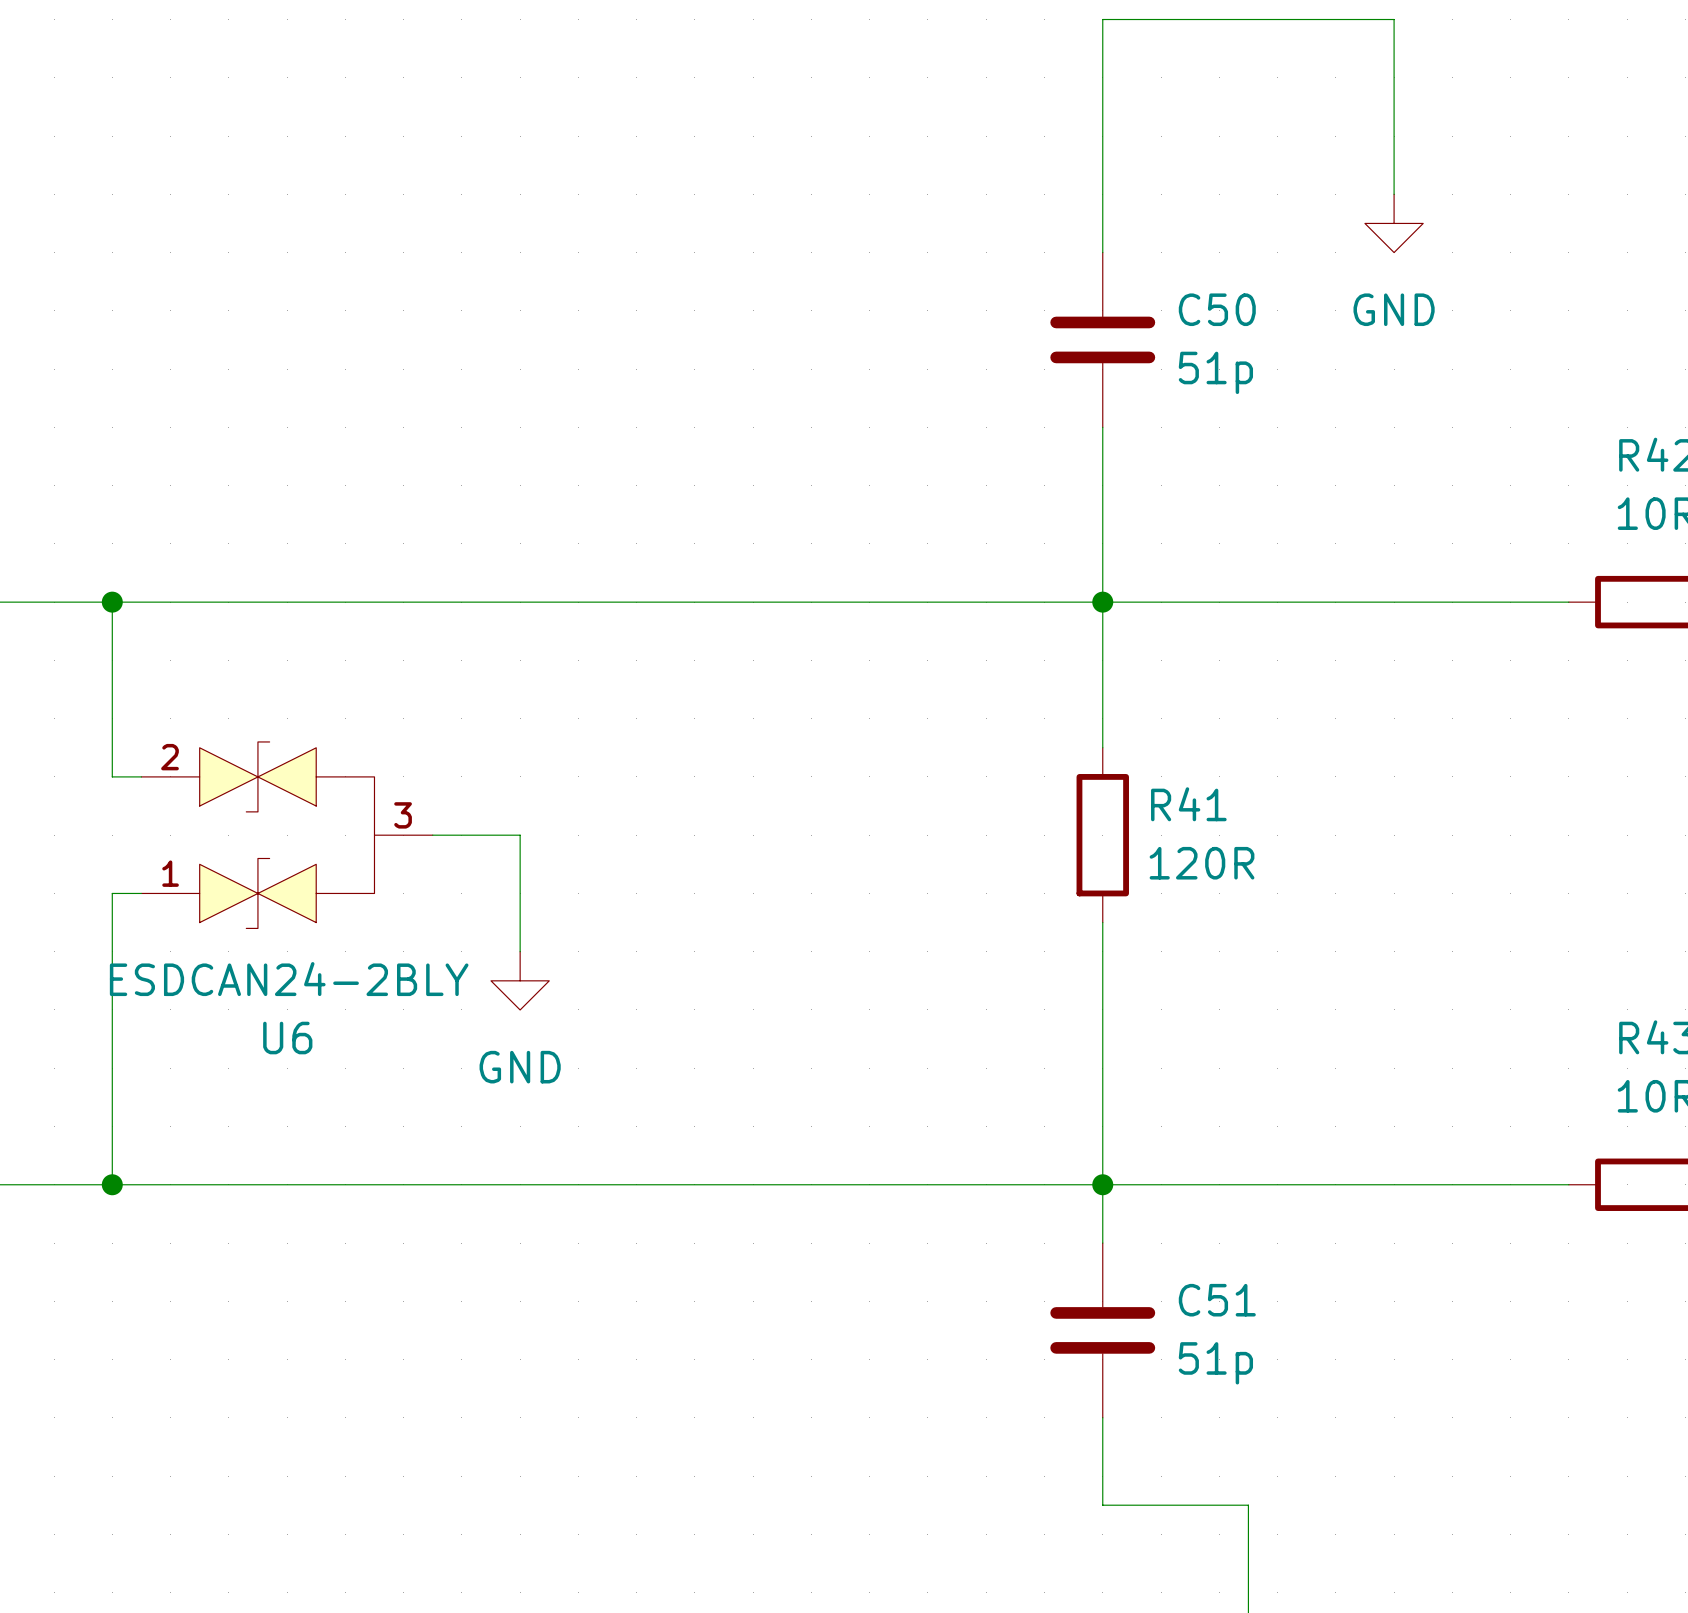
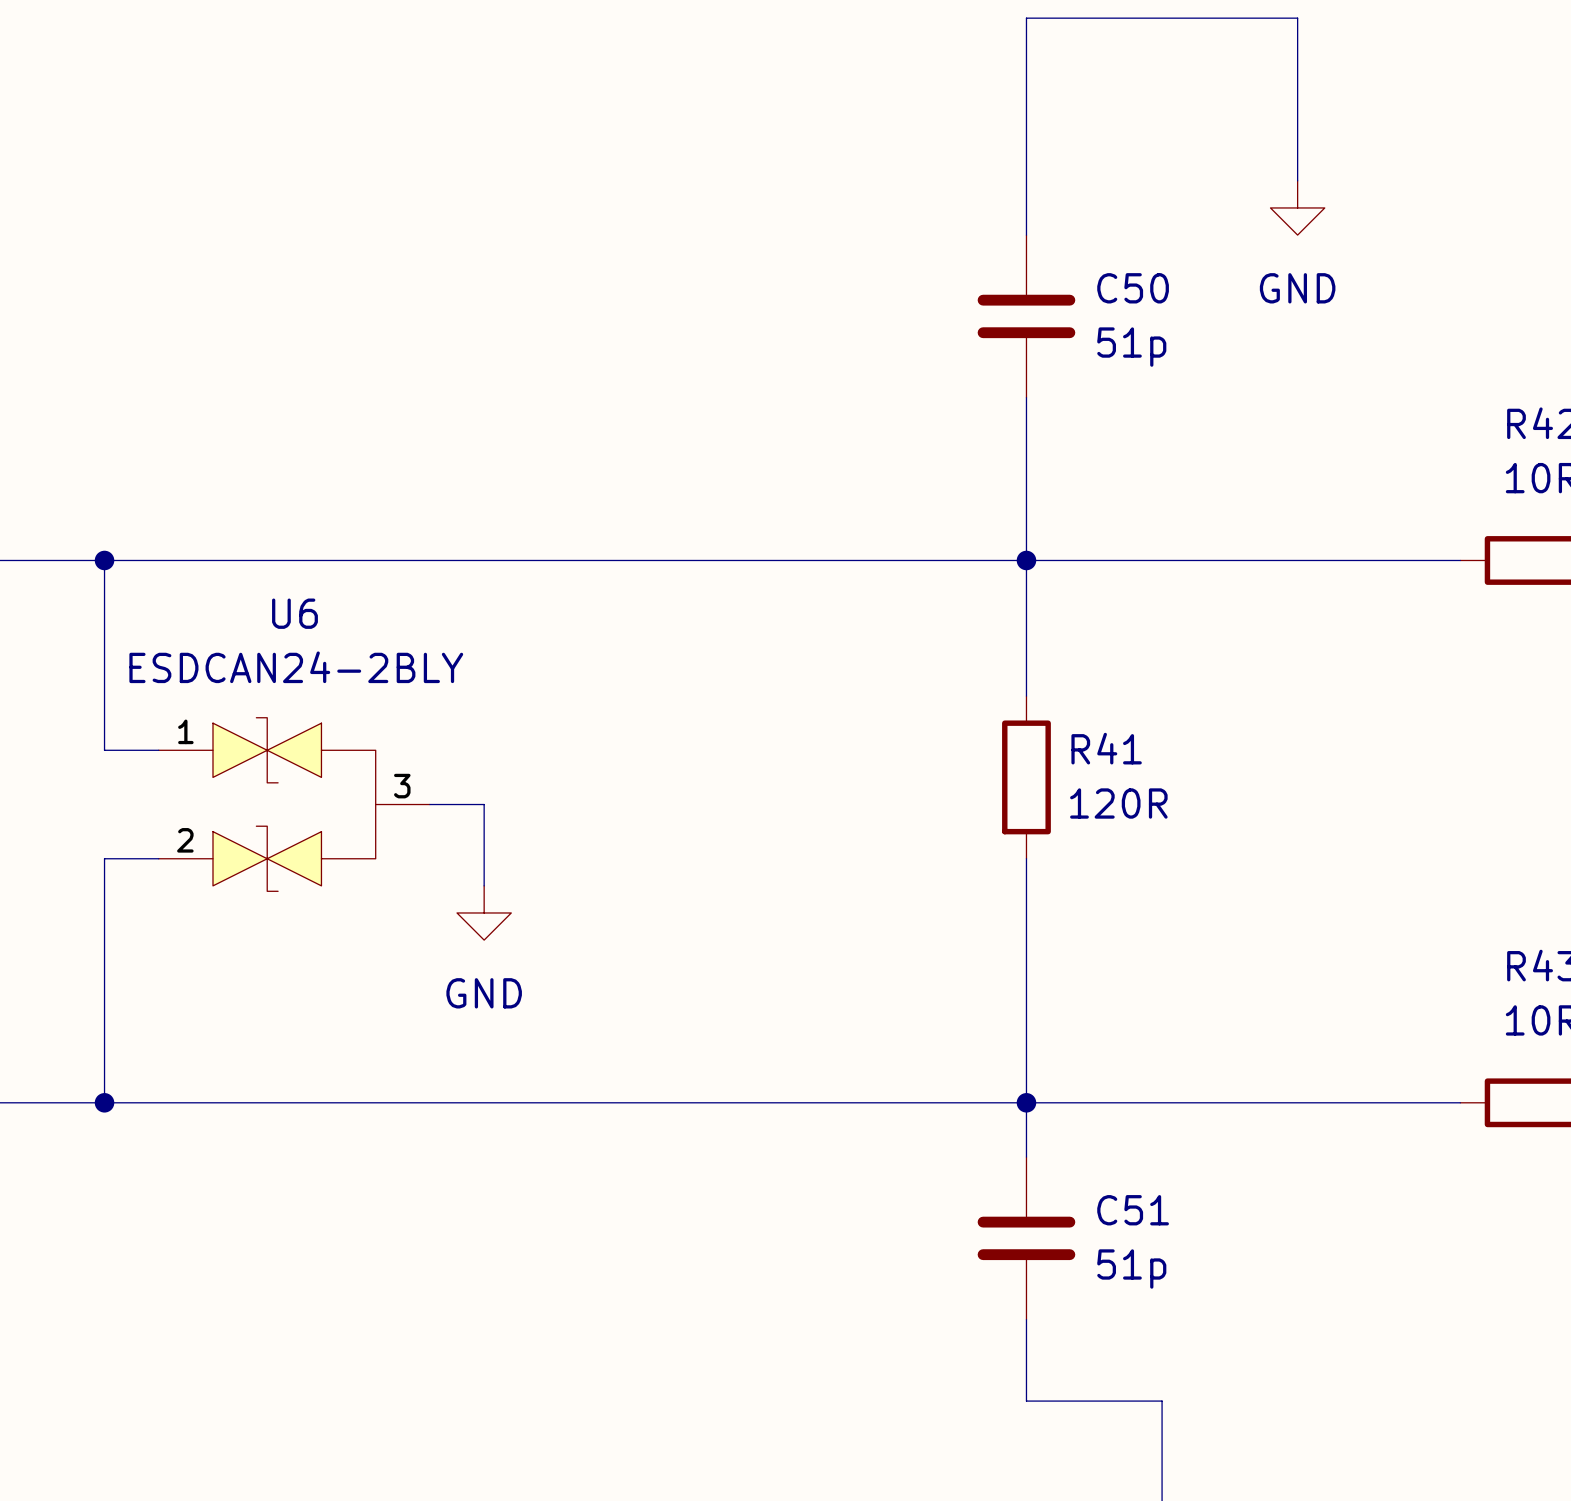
wire: (112, 776) (141, 776) -> (104, 723) (104, 750) (158, 750)
U6 flip: as is (287, 835) -> up-down (294, 804)
wire: (432, 835) (520, 835) (520, 864) -> (429, 804) (484, 804)
wire: (141, 893) (112, 893) (112, 922) -> (158, 858) (104, 858)

